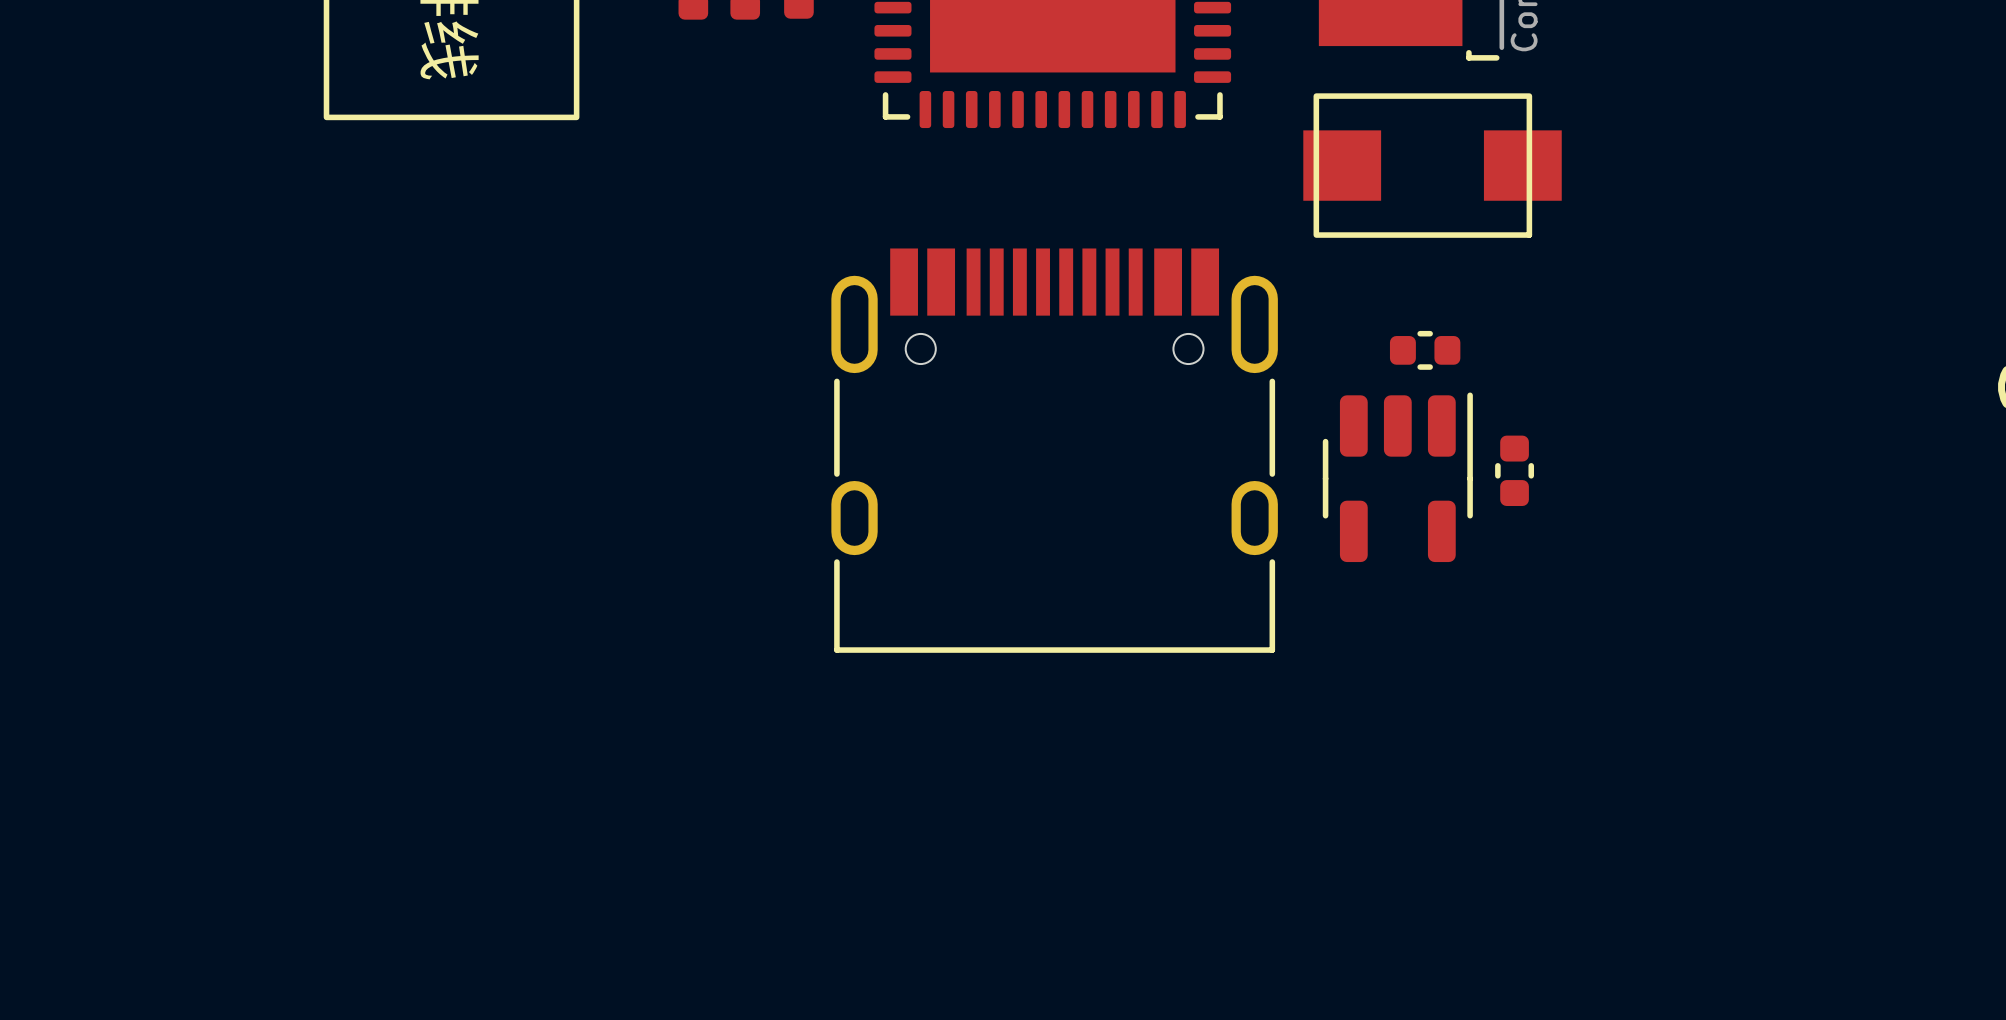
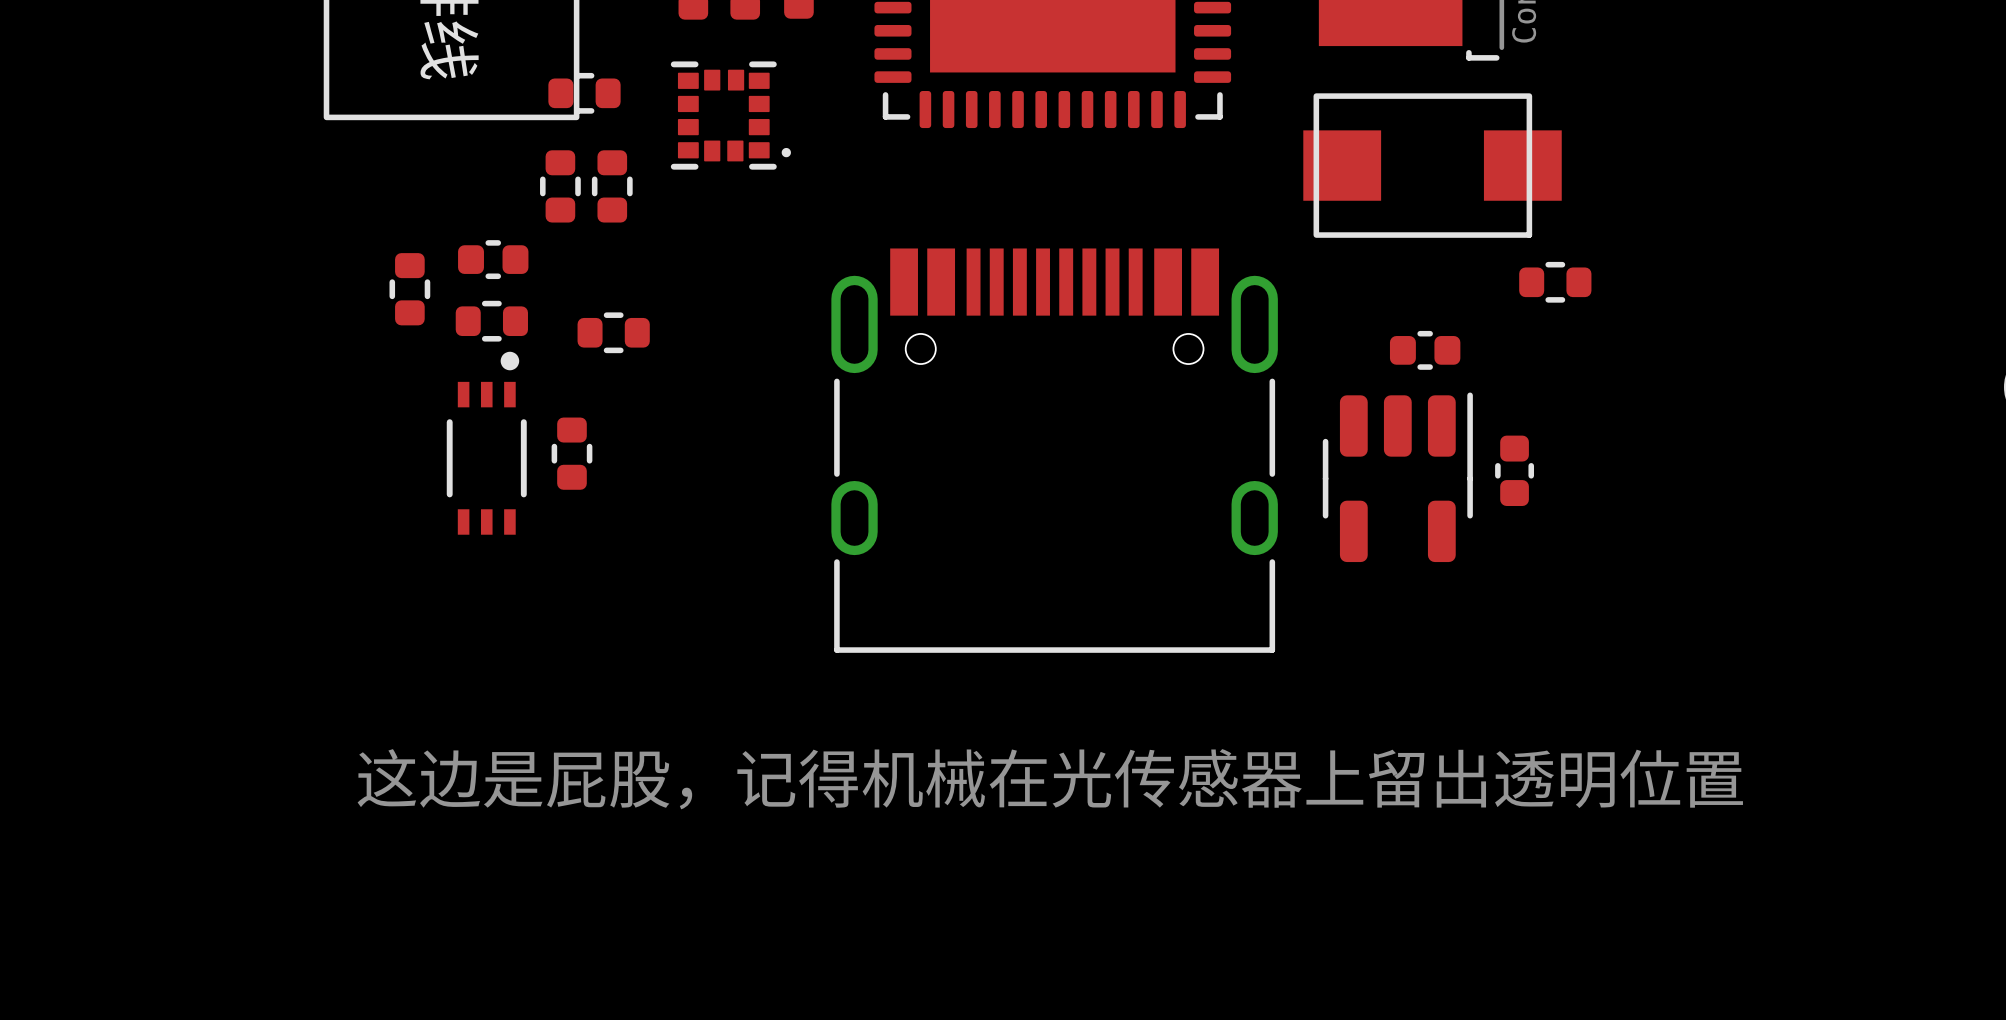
part: none -> (584, 93)
part: none -> (730, 115)
part: none -> (560, 186)
part: none -> (612, 186)
part: none -> (493, 259)
part: none -> (1555, 282)
part: none -> (409, 289)
part: none -> (491, 321)
part: none -> (613, 332)
part: none -> (486, 443)
part: none -> (571, 453)
text: none -> 这边是屁股，记得机械在光传感器上留出透明位置 (1050, 779)

